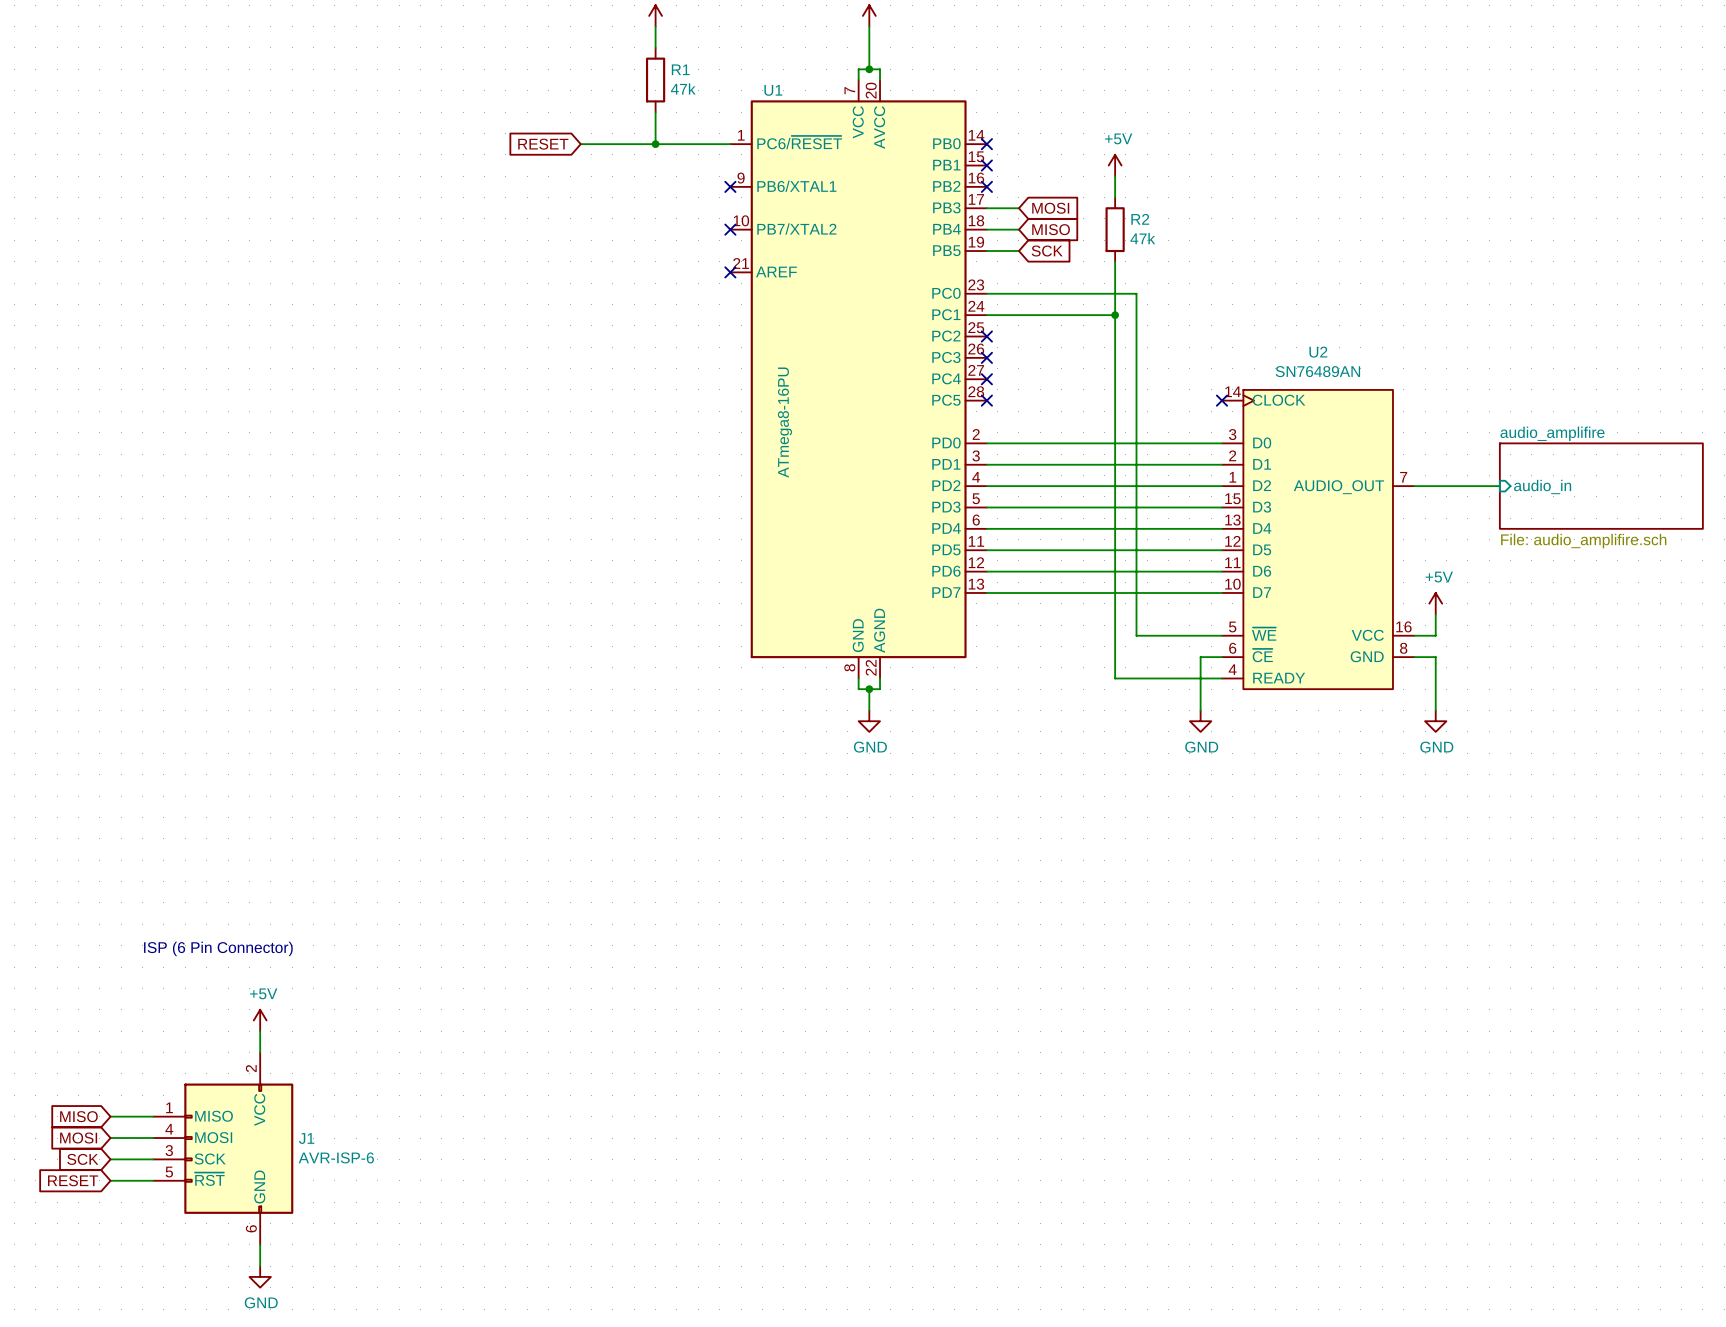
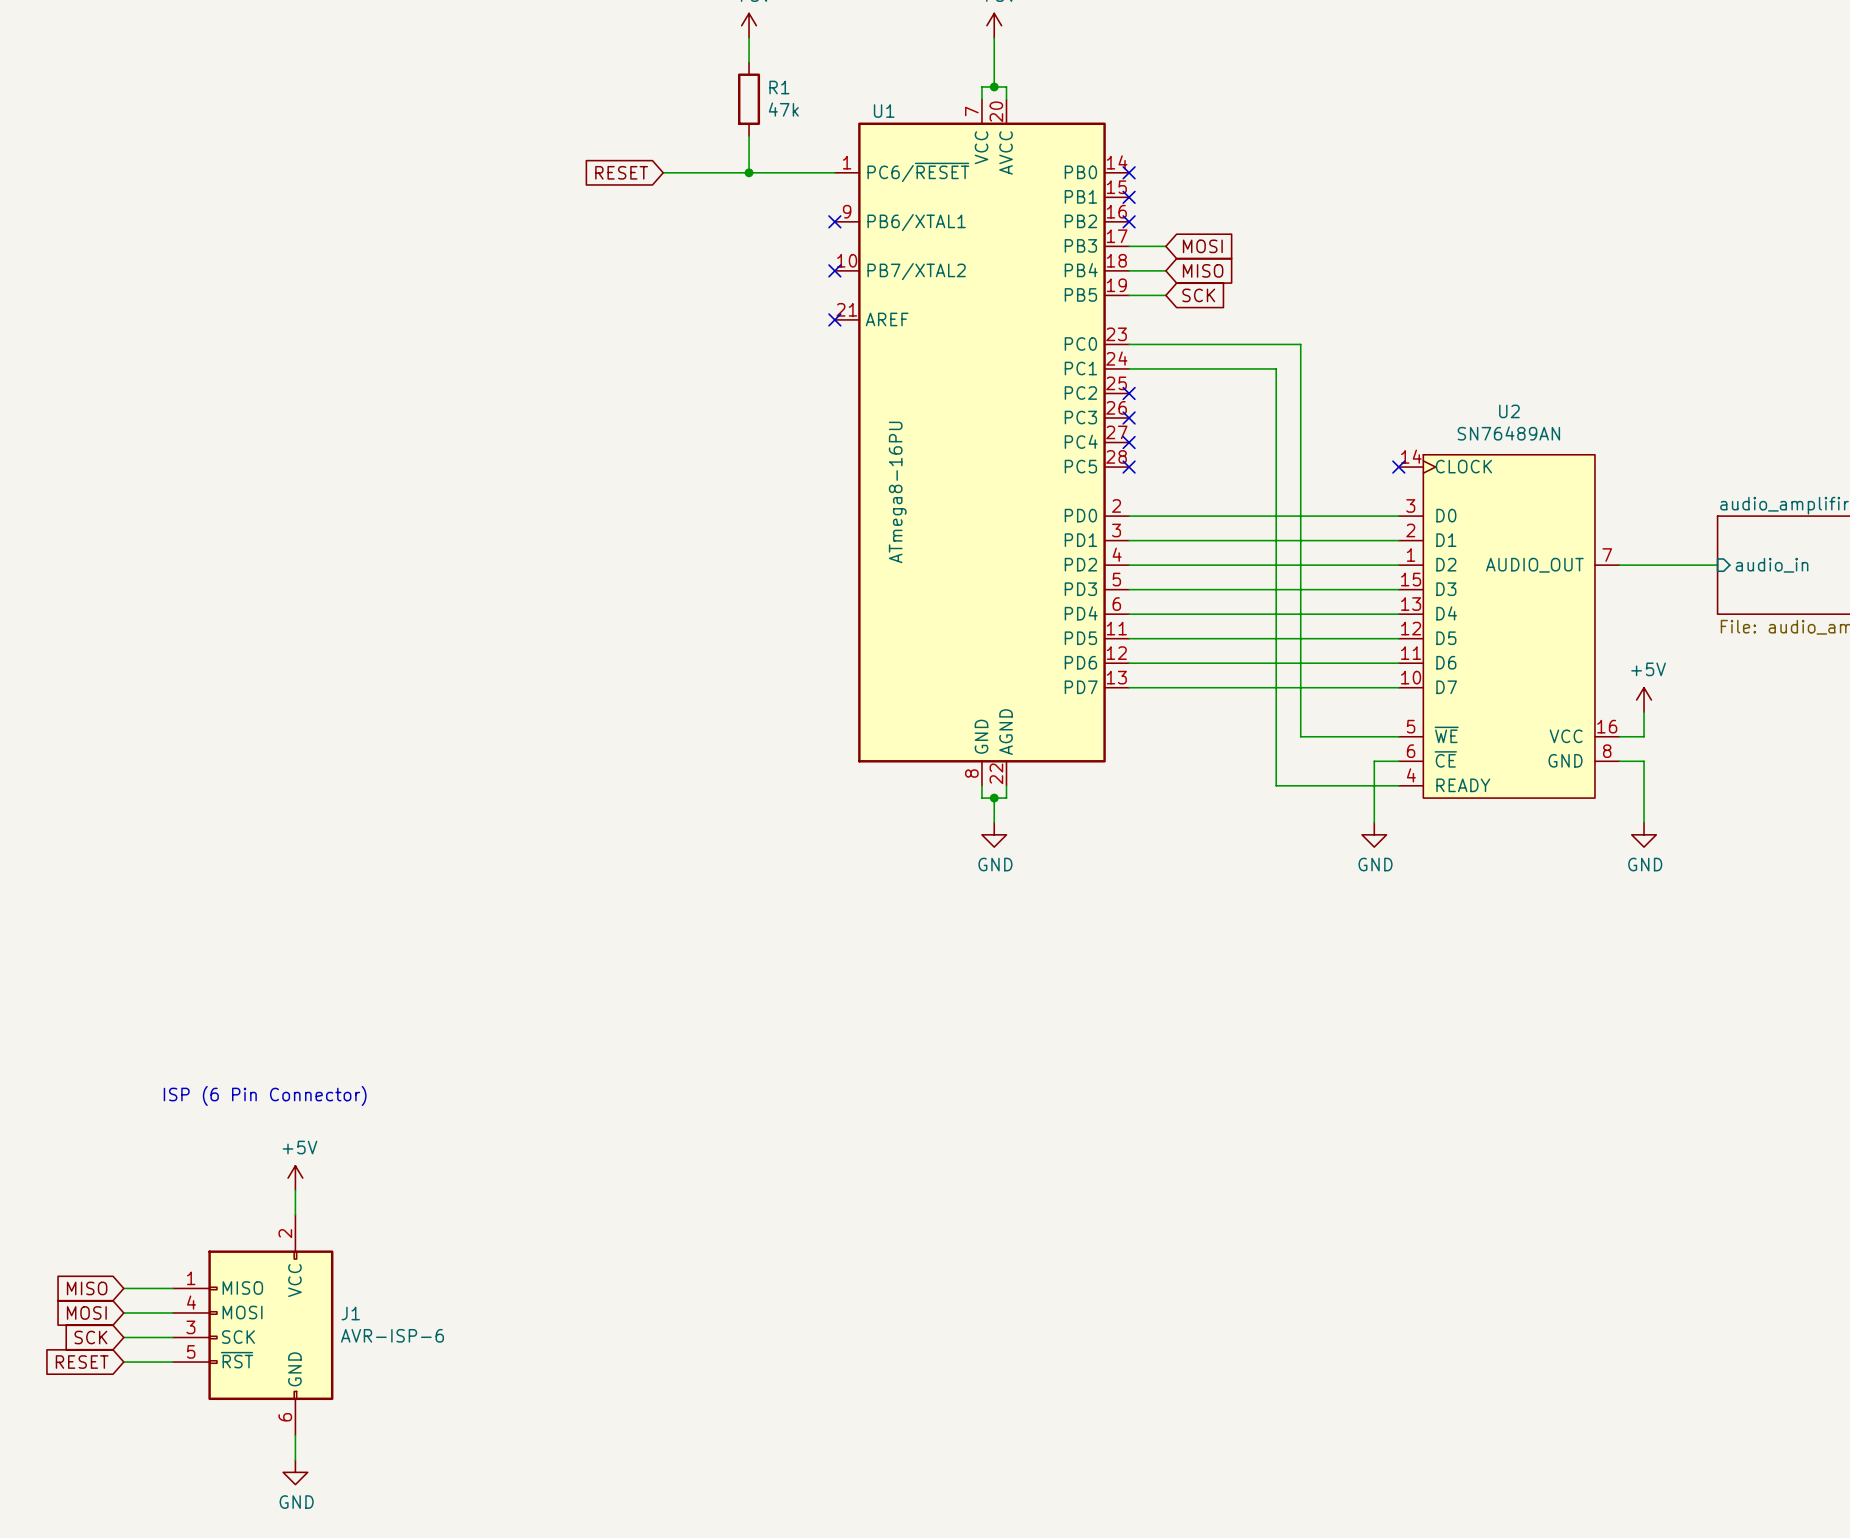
power symbol: +5V (1115, 165) -> none
wire: (1115, 176) (1115, 197) -> none
R2: 47k (1115, 229) -> none
wire: (1115, 261) (1115, 315) -> none
junction: (1115, 315) -> none

